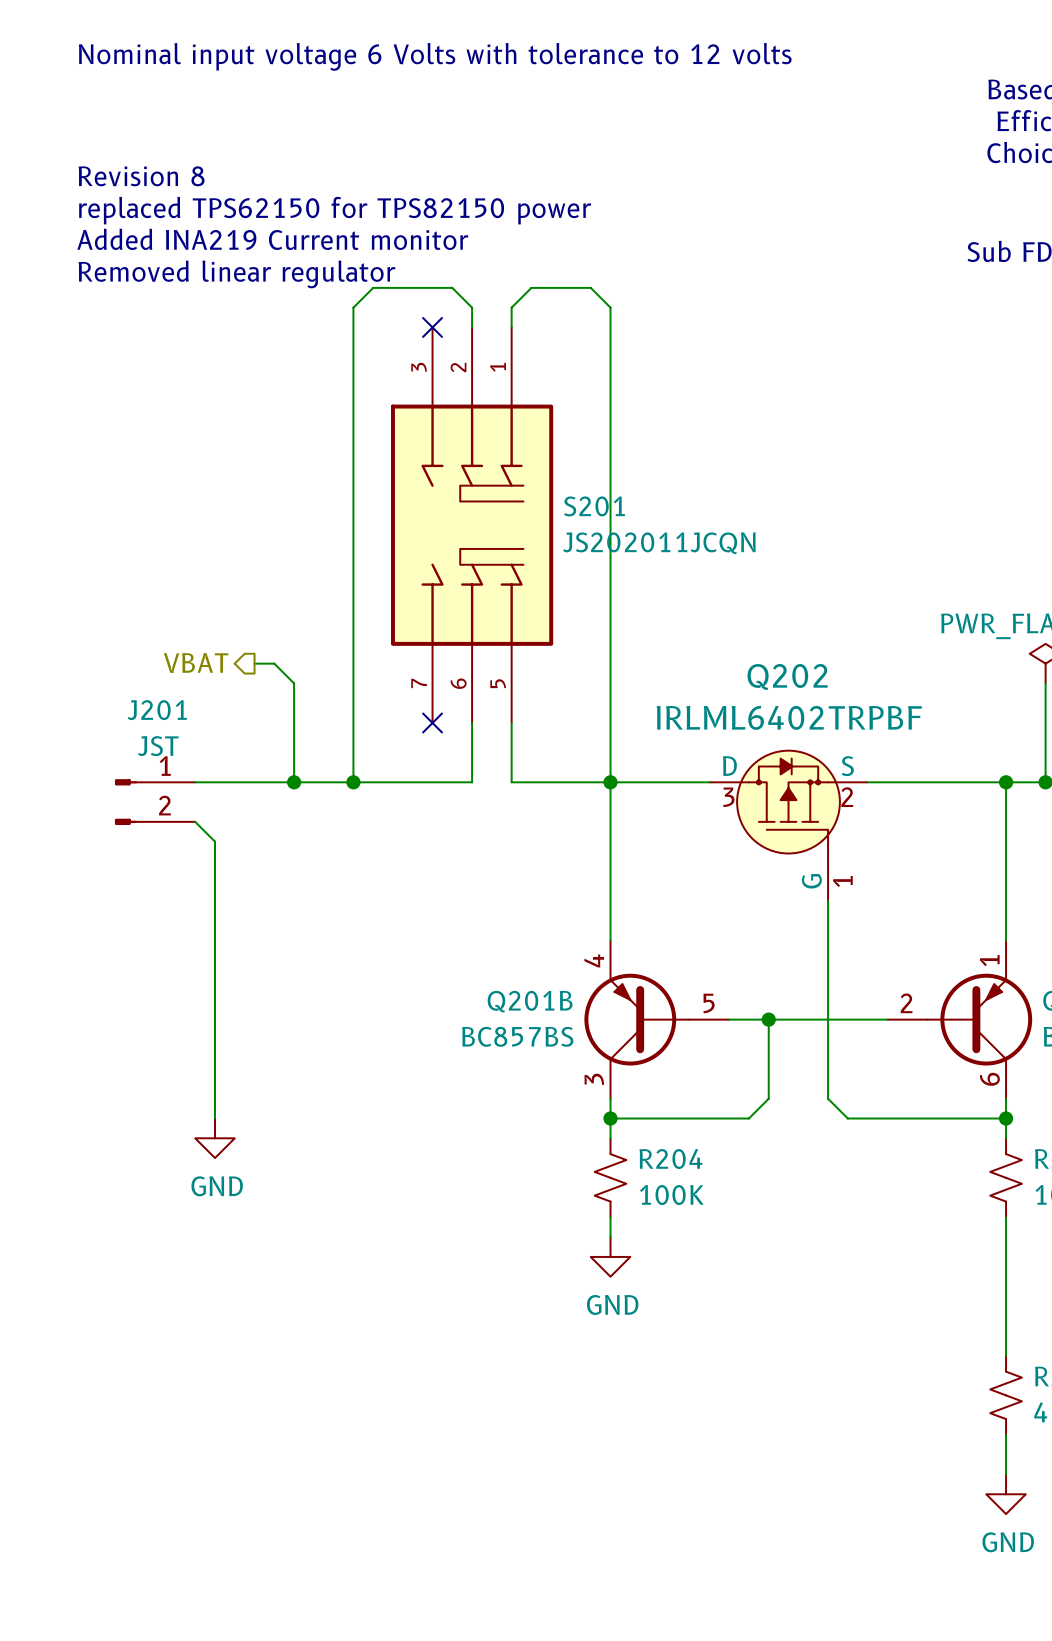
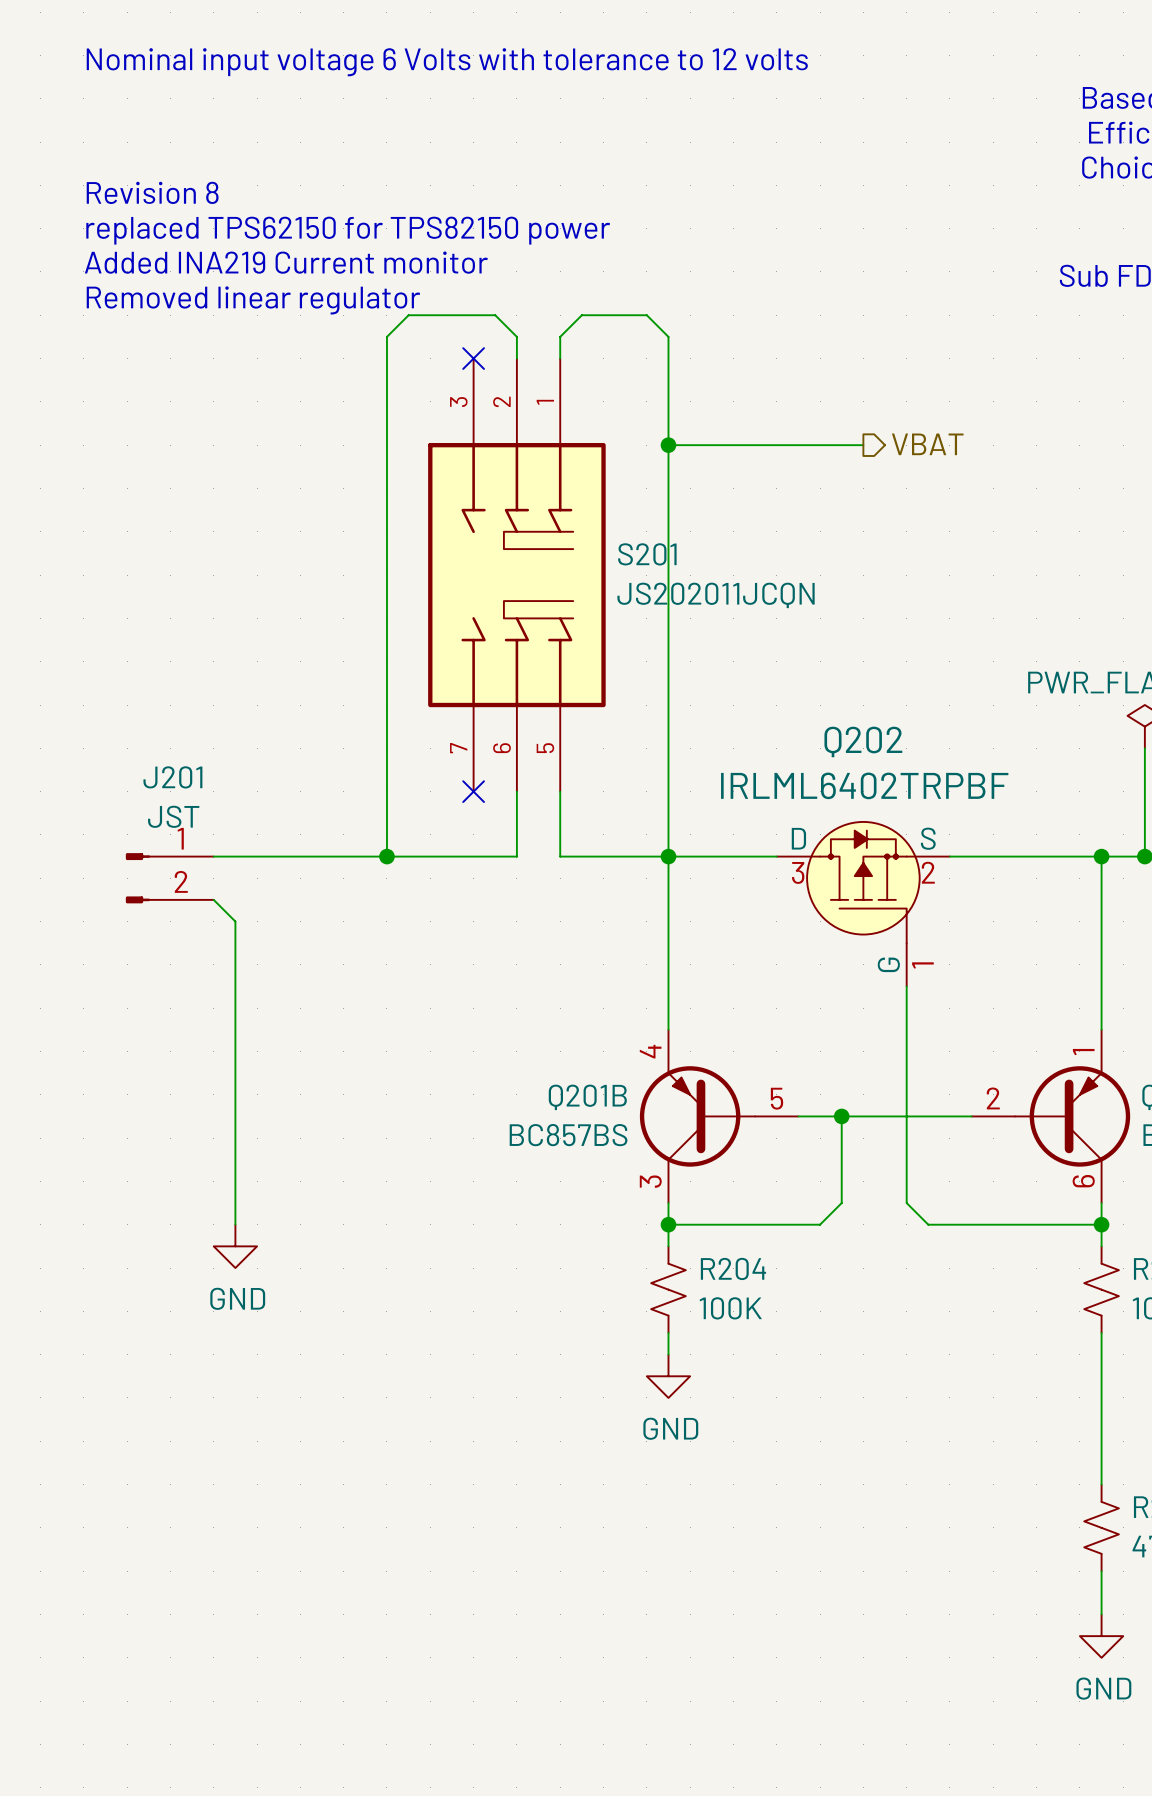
hierarchical label: none -> VBAT (927, 444)
wire: none -> (668, 445) (863, 445)
junction: none -> (668, 445)
hierarchical label: VBAT (196, 663) -> none
wire: (254, 663) (274, 663) (294, 683) (294, 782) -> none
junction: (294, 782) -> none

